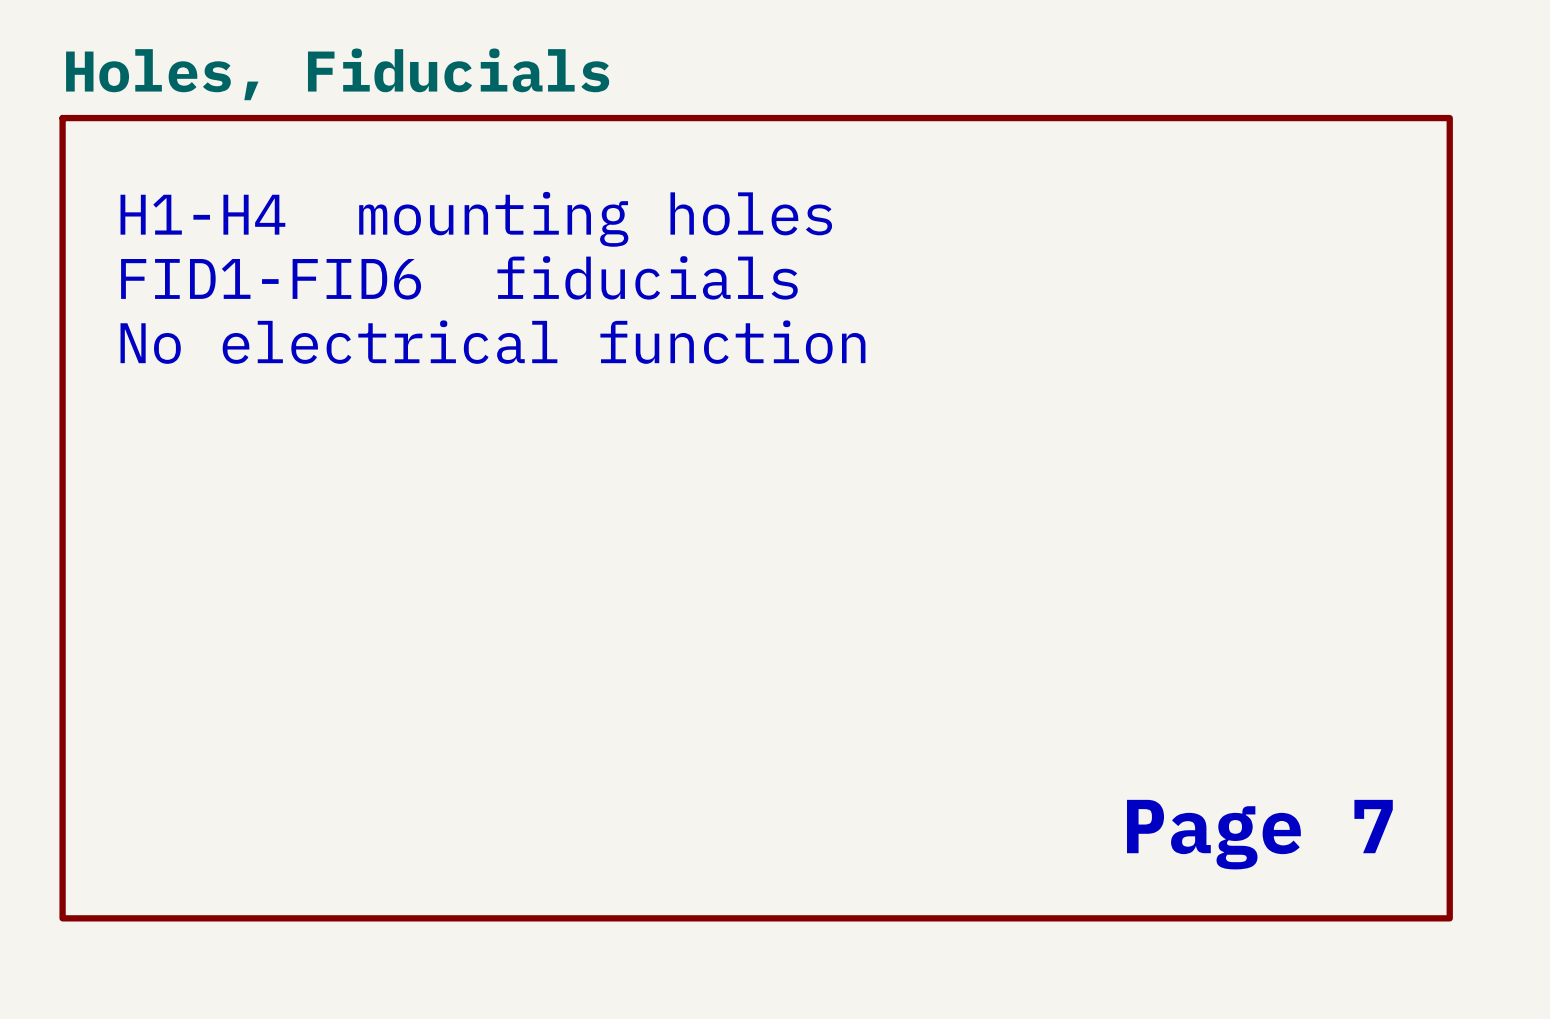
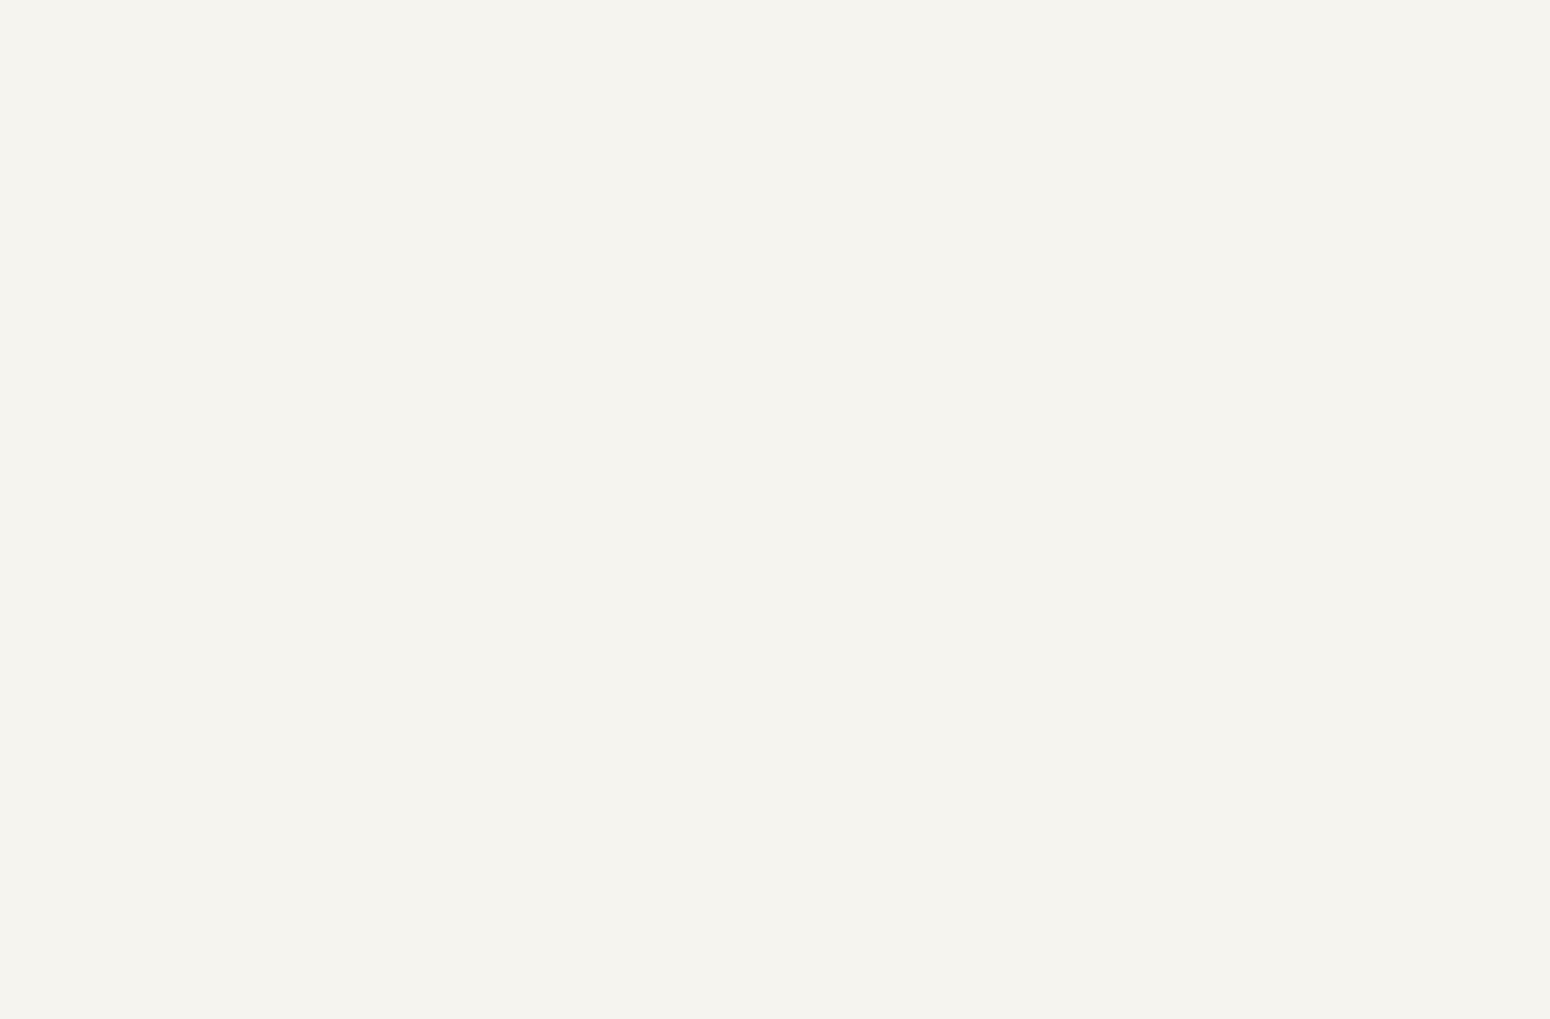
text: H1-H4 mounting holes (476, 219) -> none
text: FID1-FID6 fiducials (459, 277) -> none
text: No electrical function (492, 342) -> none
sheet Holes, Fiducials: (756, 518) -> none
text: Page 7 (1259, 834) -> none

